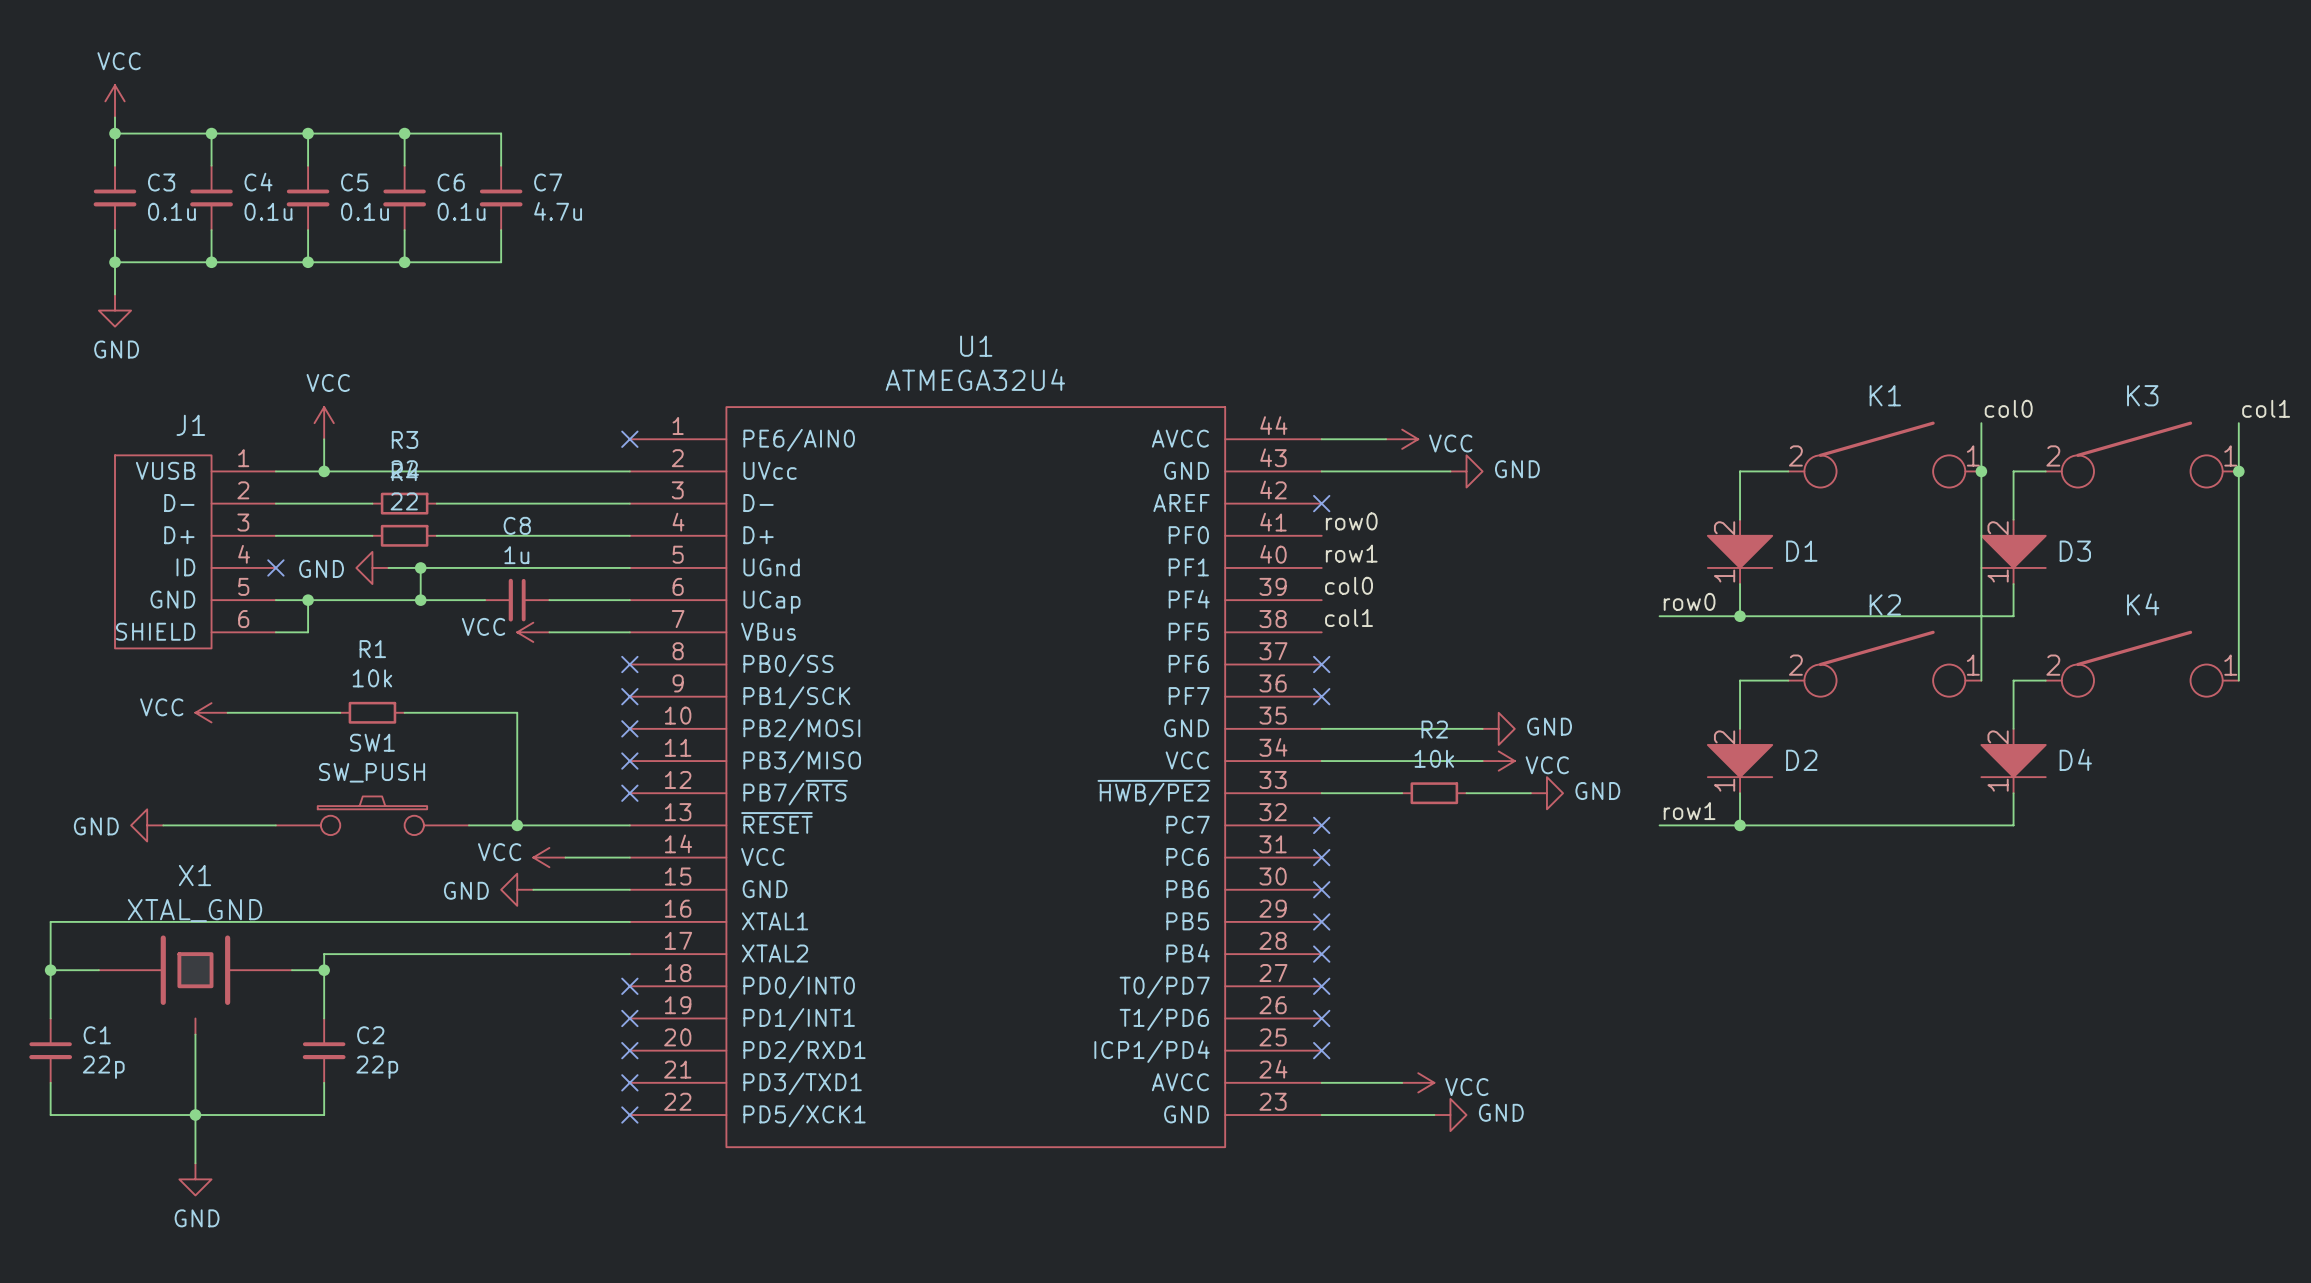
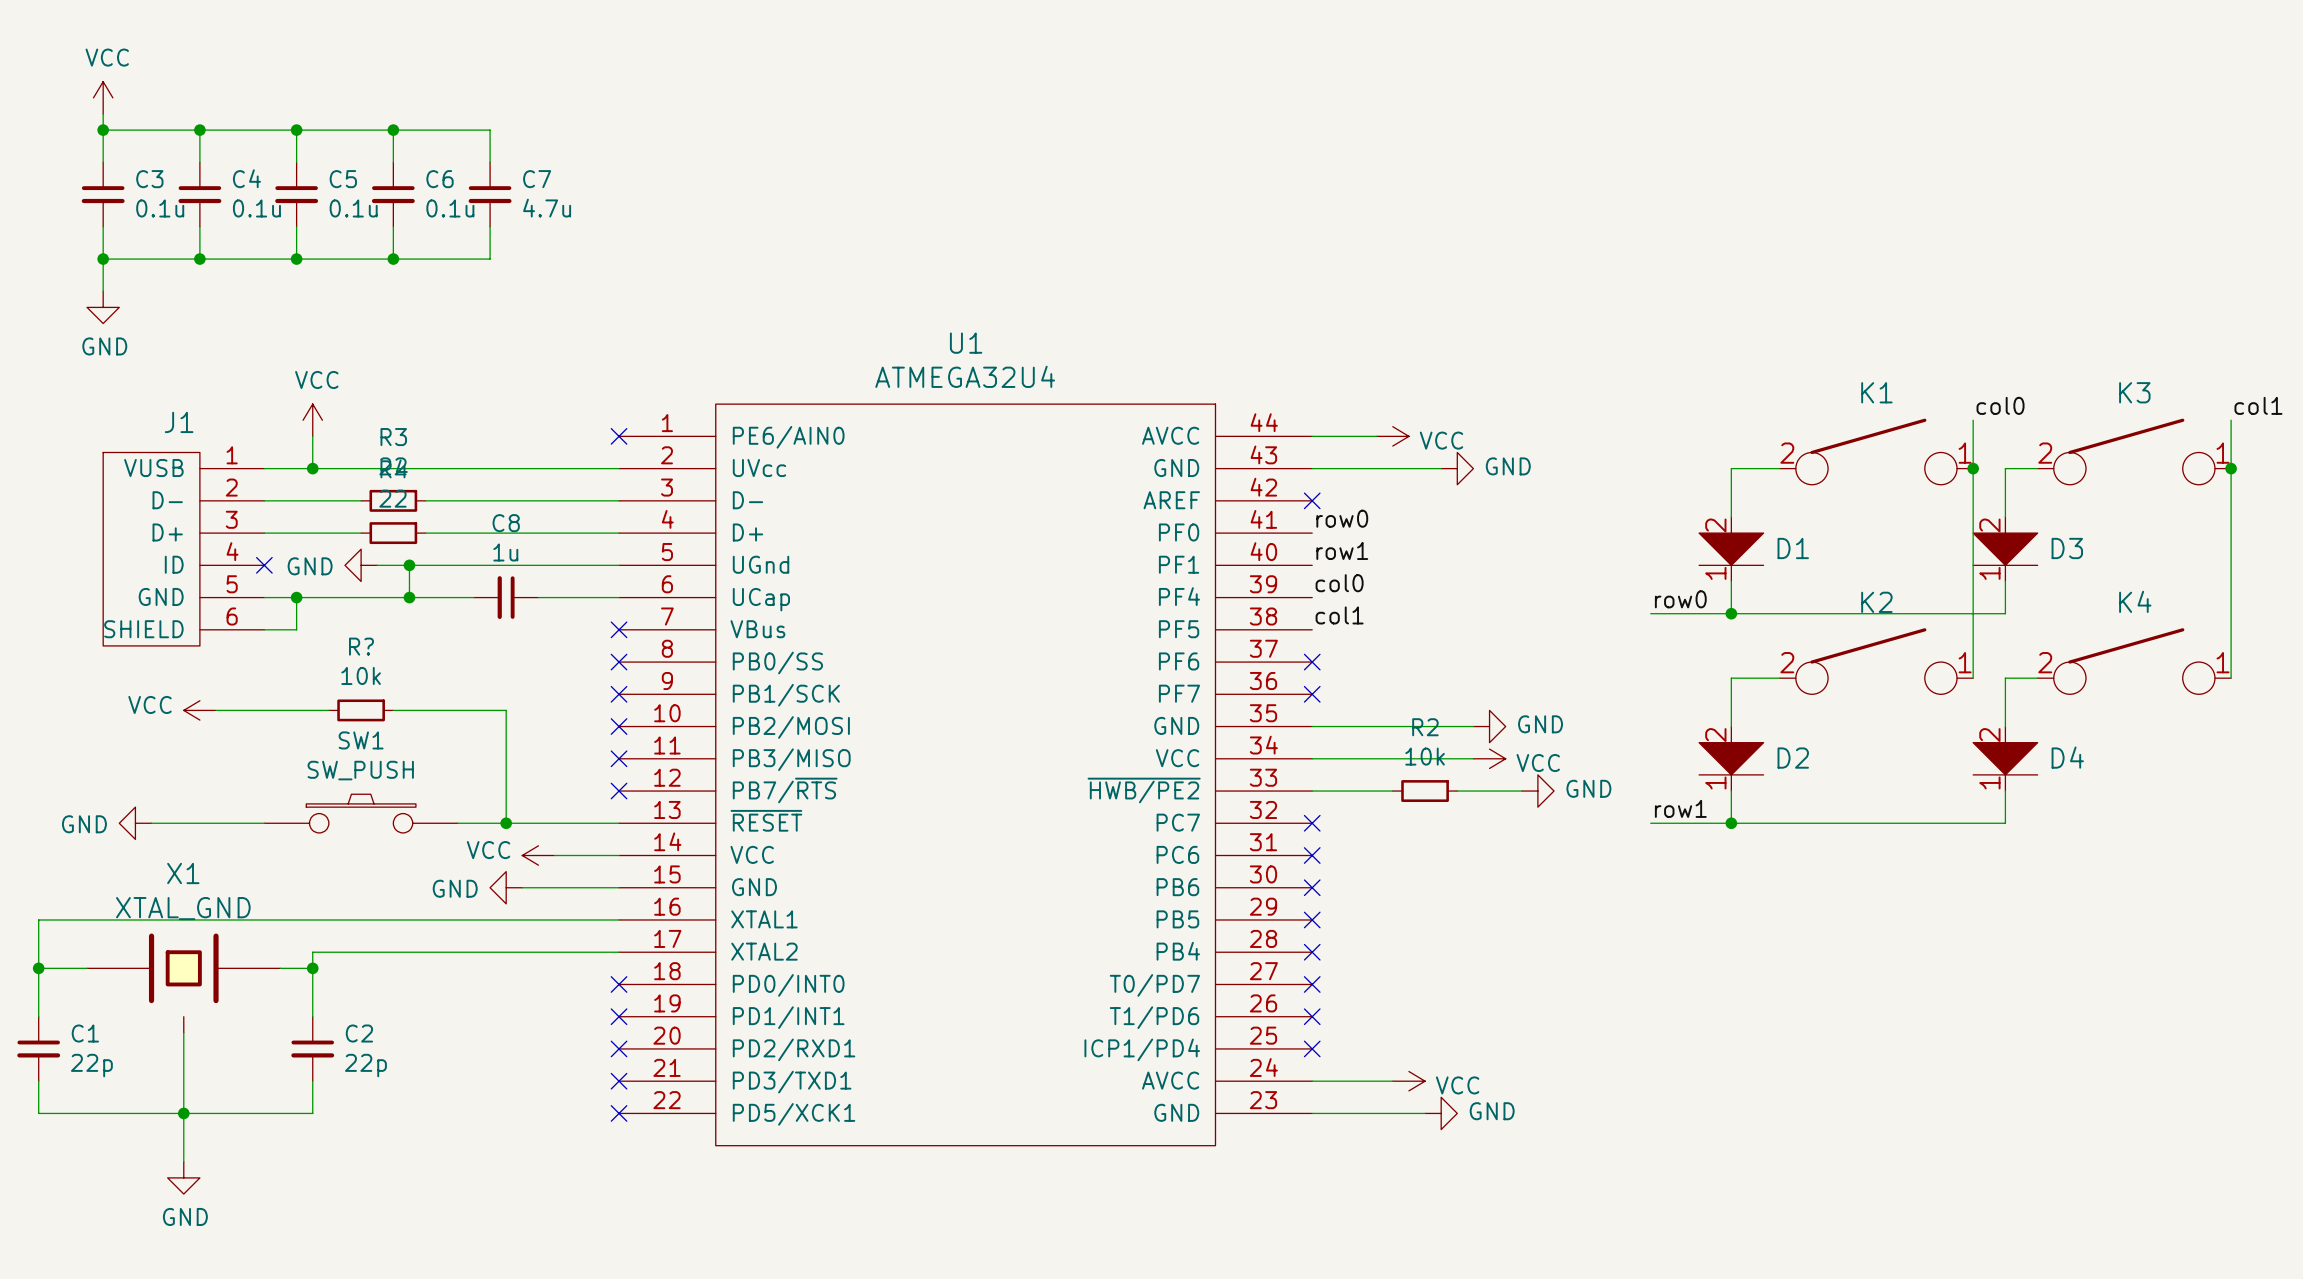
power symbol: VCC (533, 632) -> none
wire: (549, 632) (629, 632) -> none
no-connect mark: none -> (619, 629)
R1 name: R1 (372, 649) -> R? (361, 646)

